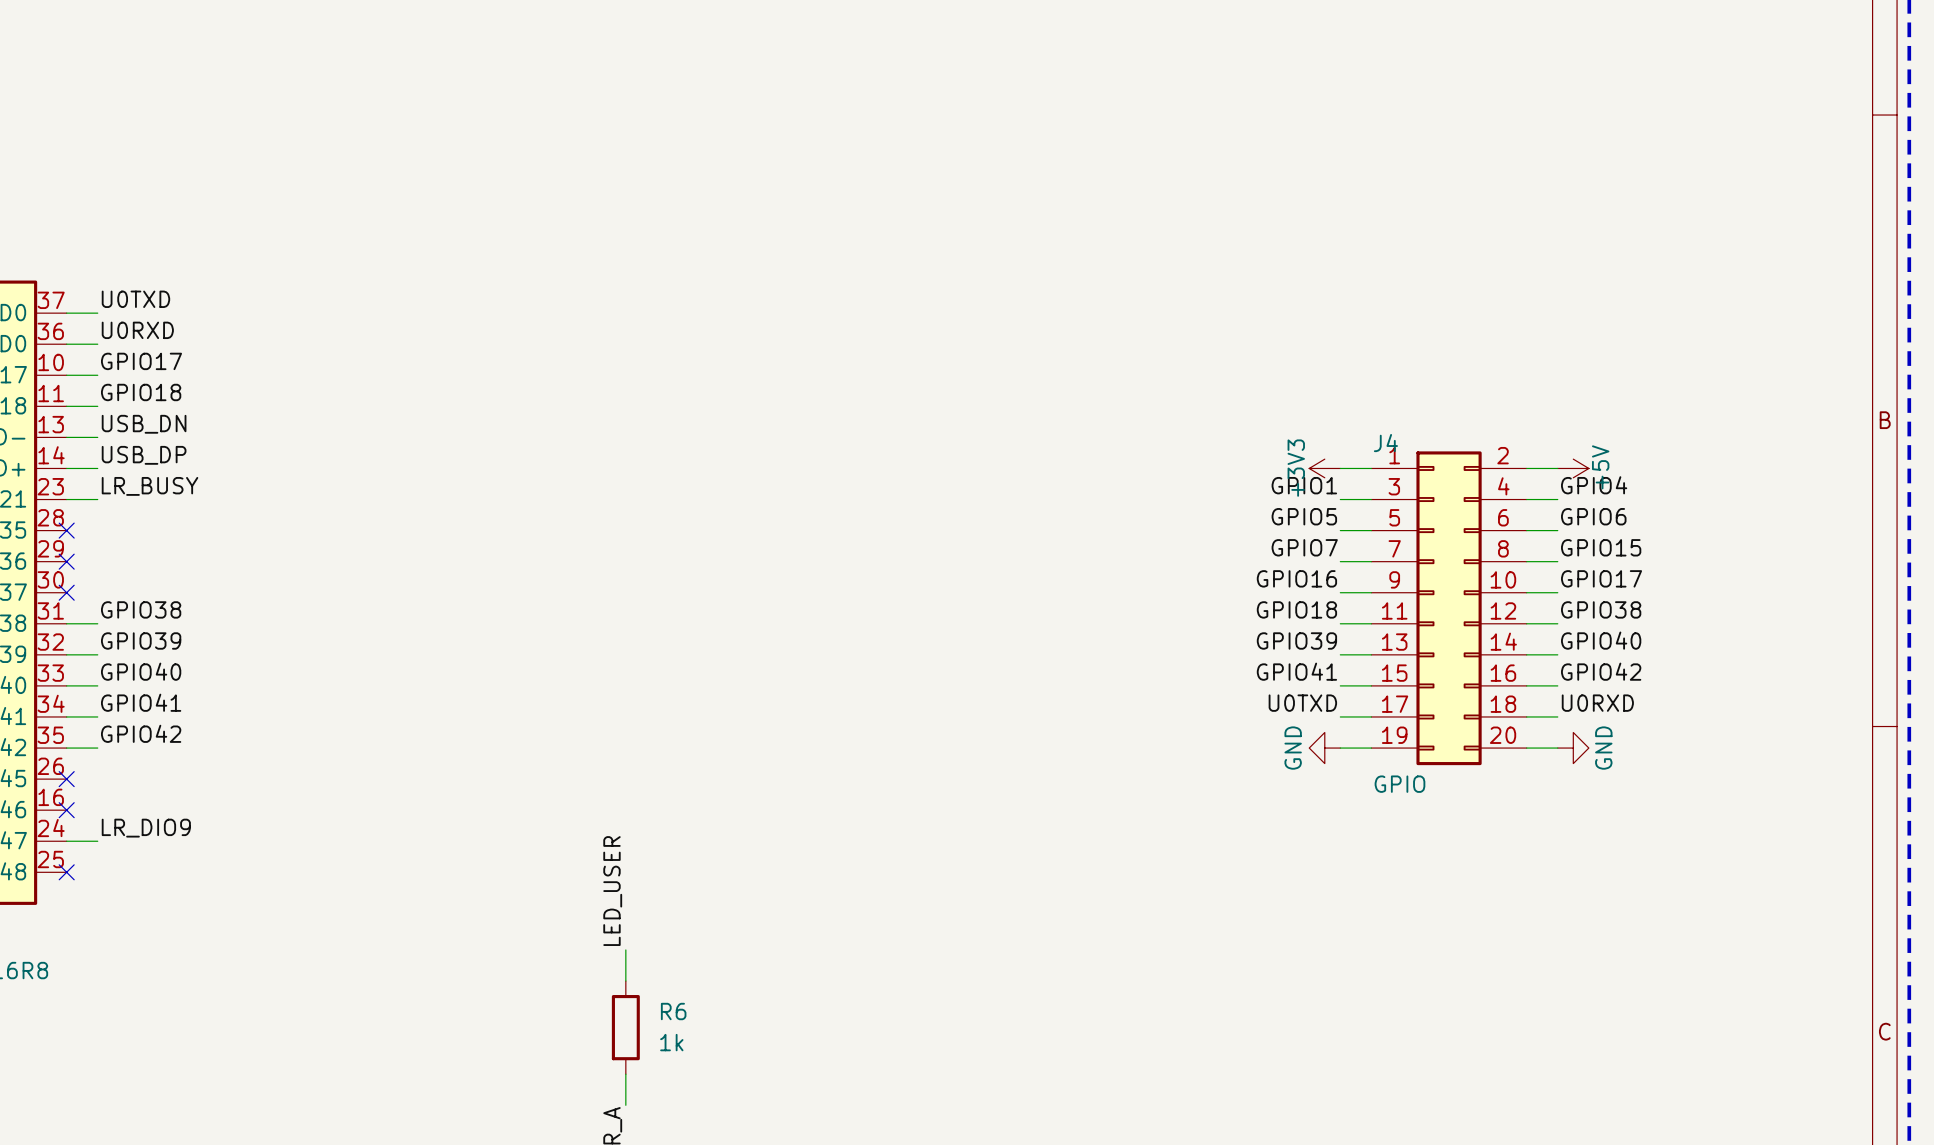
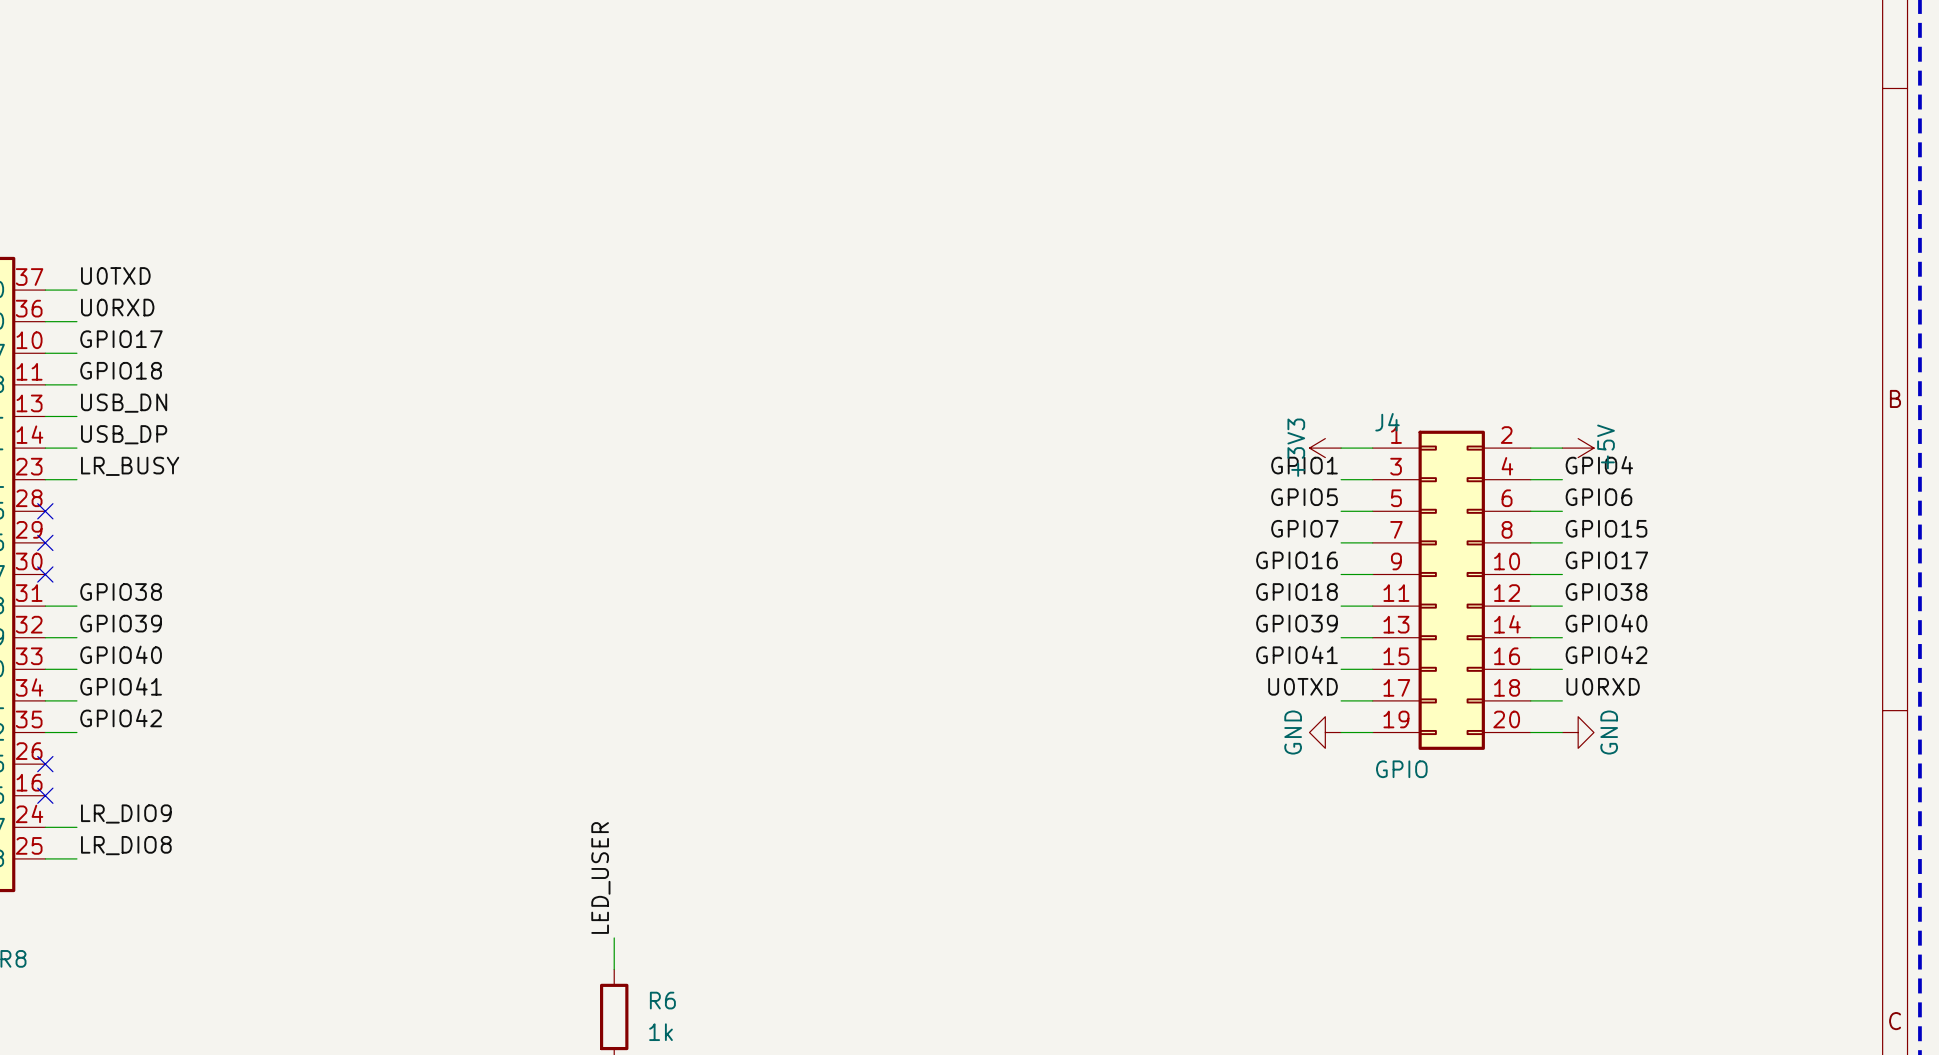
label: none -> LR_DIO8 (126, 845)
wire: none -> (45, 858) (76, 858)
no-connect mark: (66, 872) -> none

